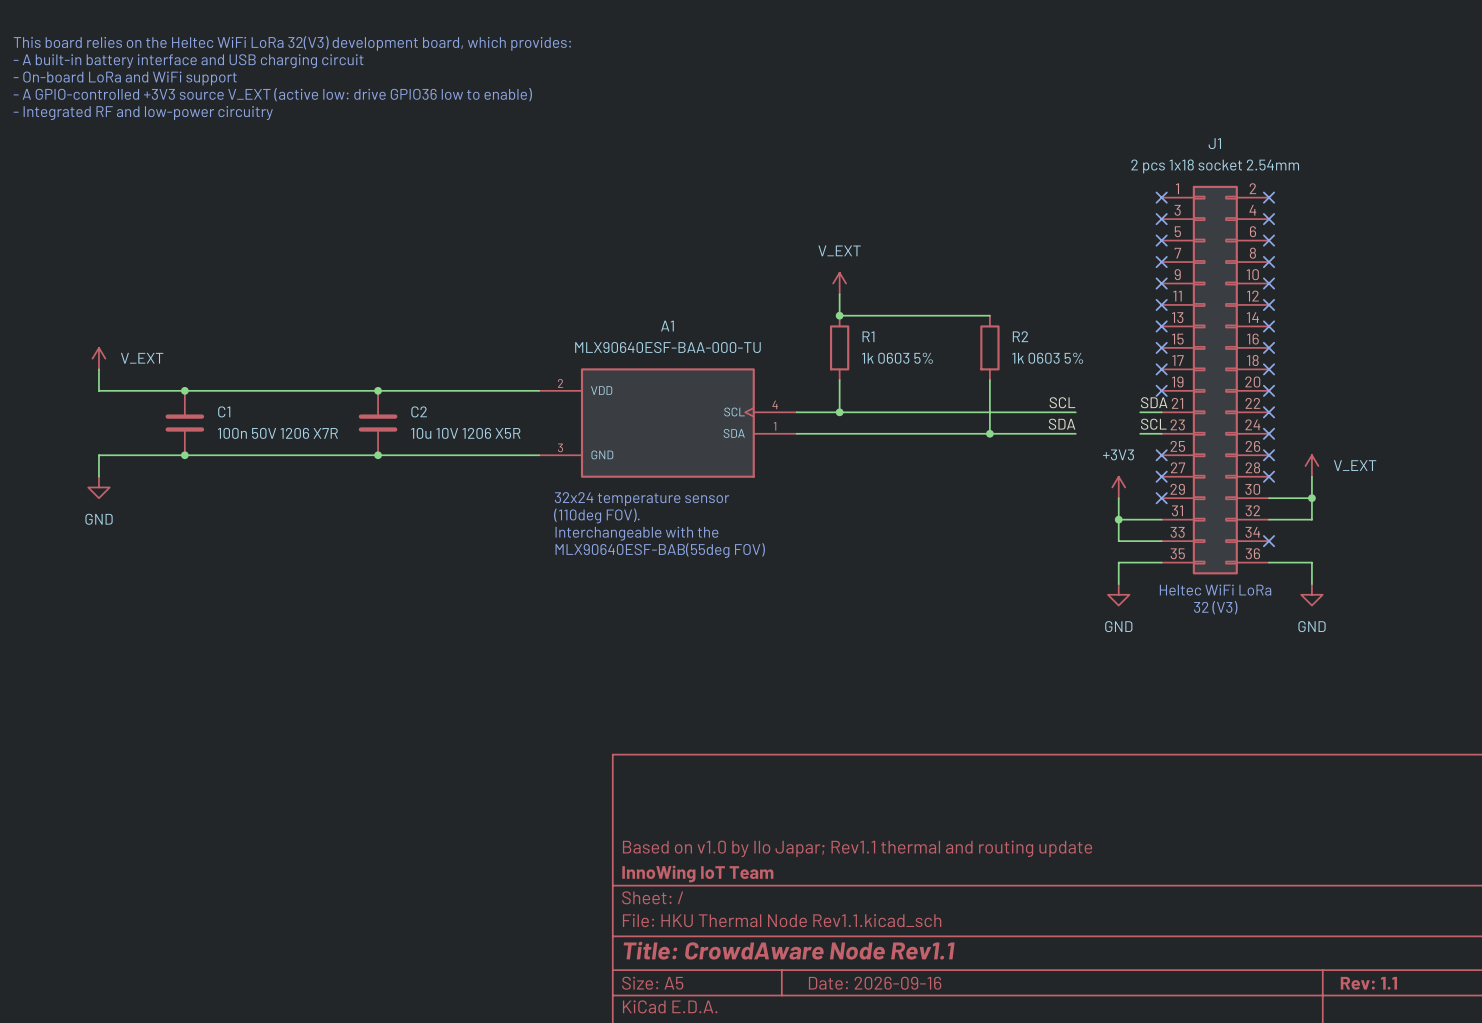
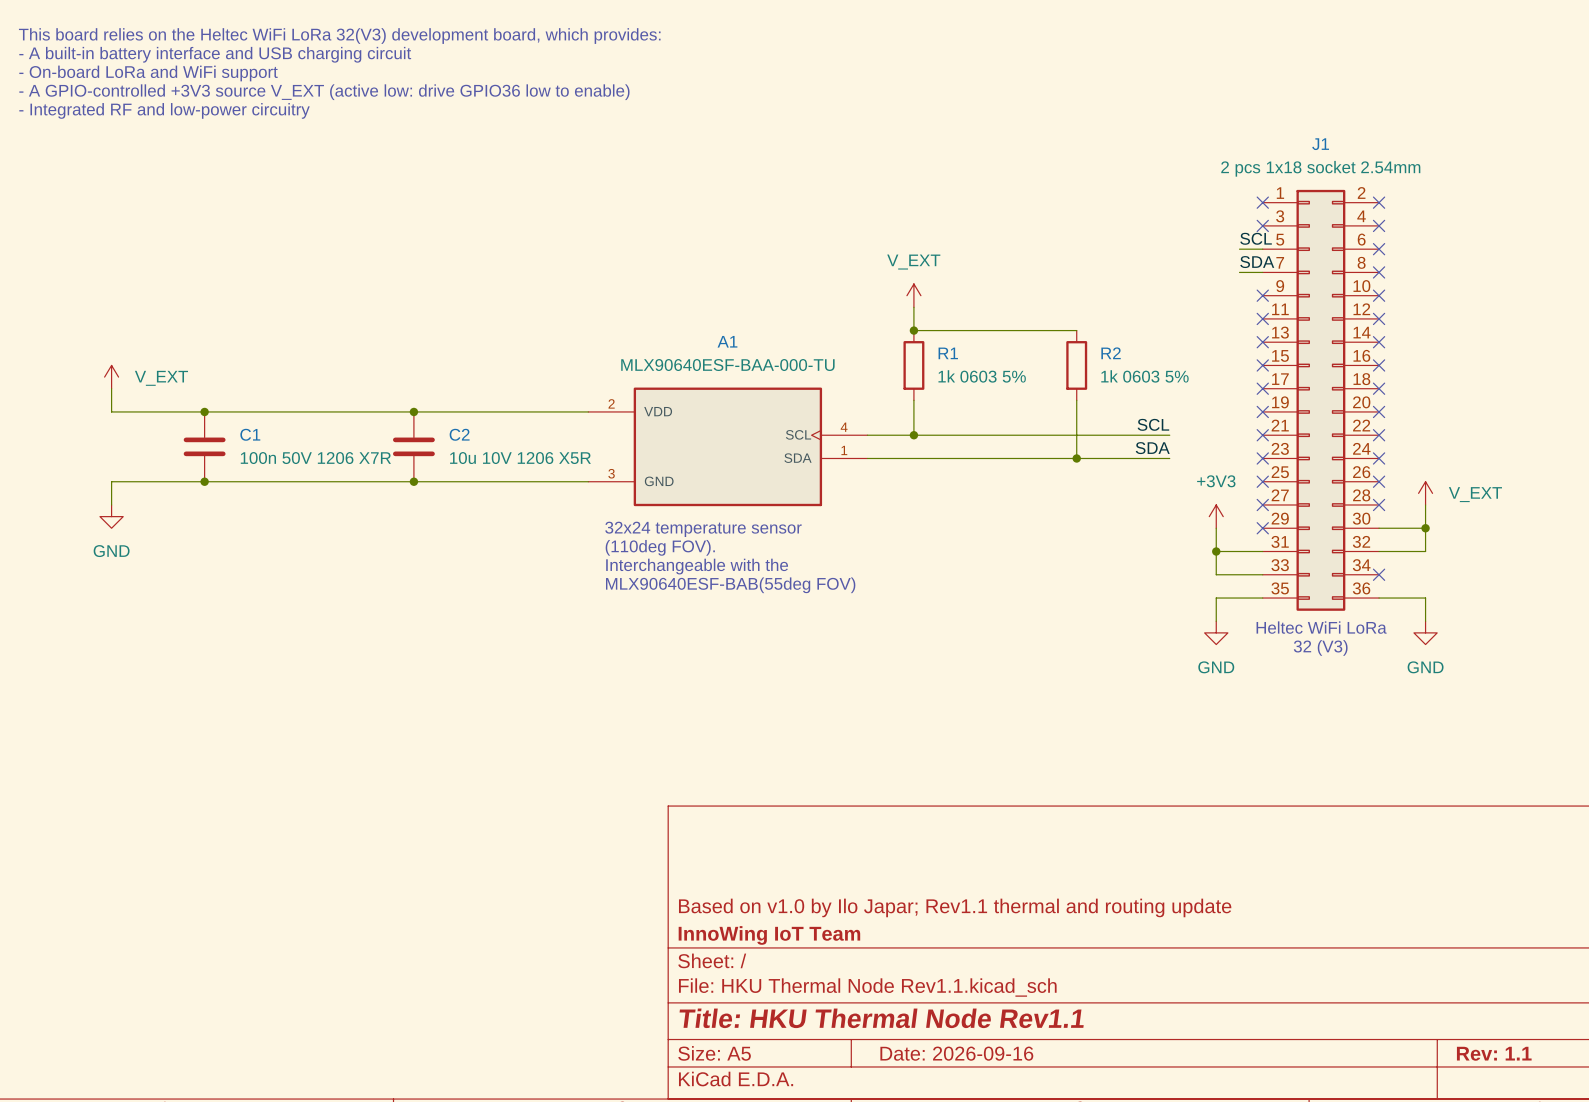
no-connect mark: (1161, 240) -> none
no-connect mark: (1161, 262) -> none
label position: SDA (1154, 402) -> SDA (1257, 262)
wire: (1140, 412) (1161, 412) -> (1239, 272) (1262, 272)
no-connect mark: none -> (1262, 435)
label position: SCL (1153, 424) -> SCL (1256, 238)
wire: (1140, 433) (1161, 433) -> (1239, 249) (1262, 249)
no-connect mark: none -> (1262, 458)
title block: Title: CrowdAware Node Rev1.1 (789, 950) -> Title: HKU Thermal Node Rev1.1 (881, 1018)

